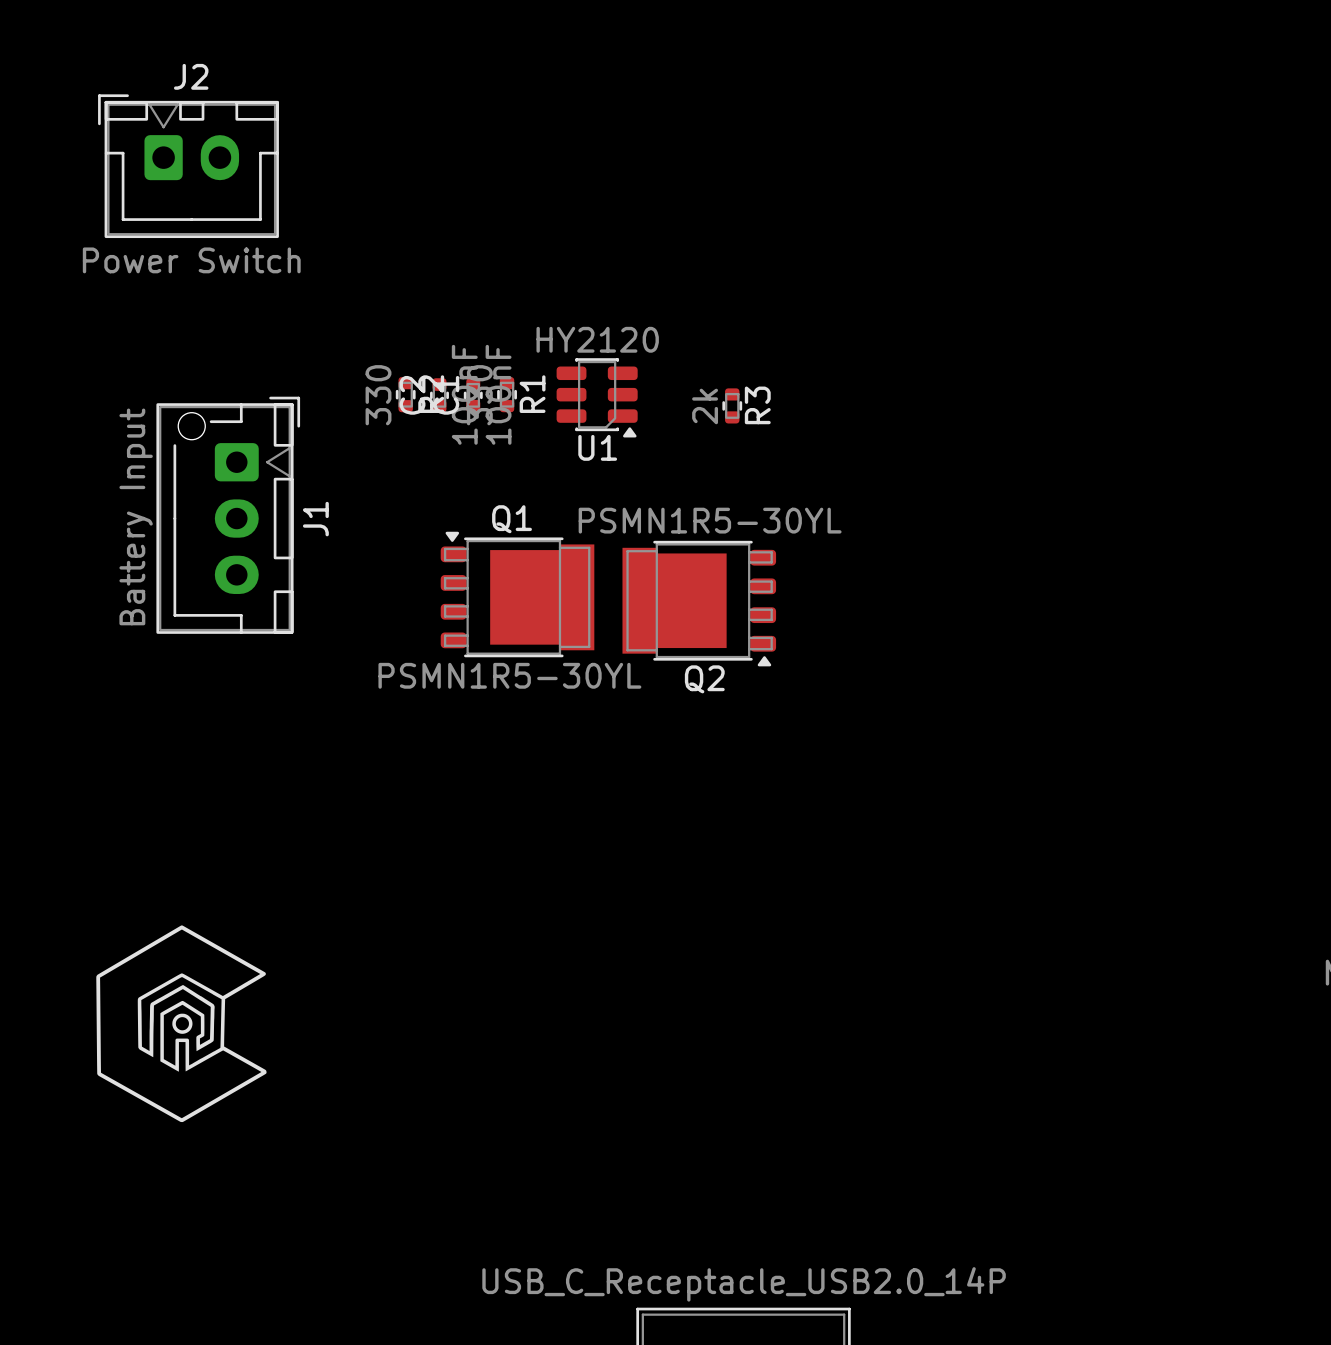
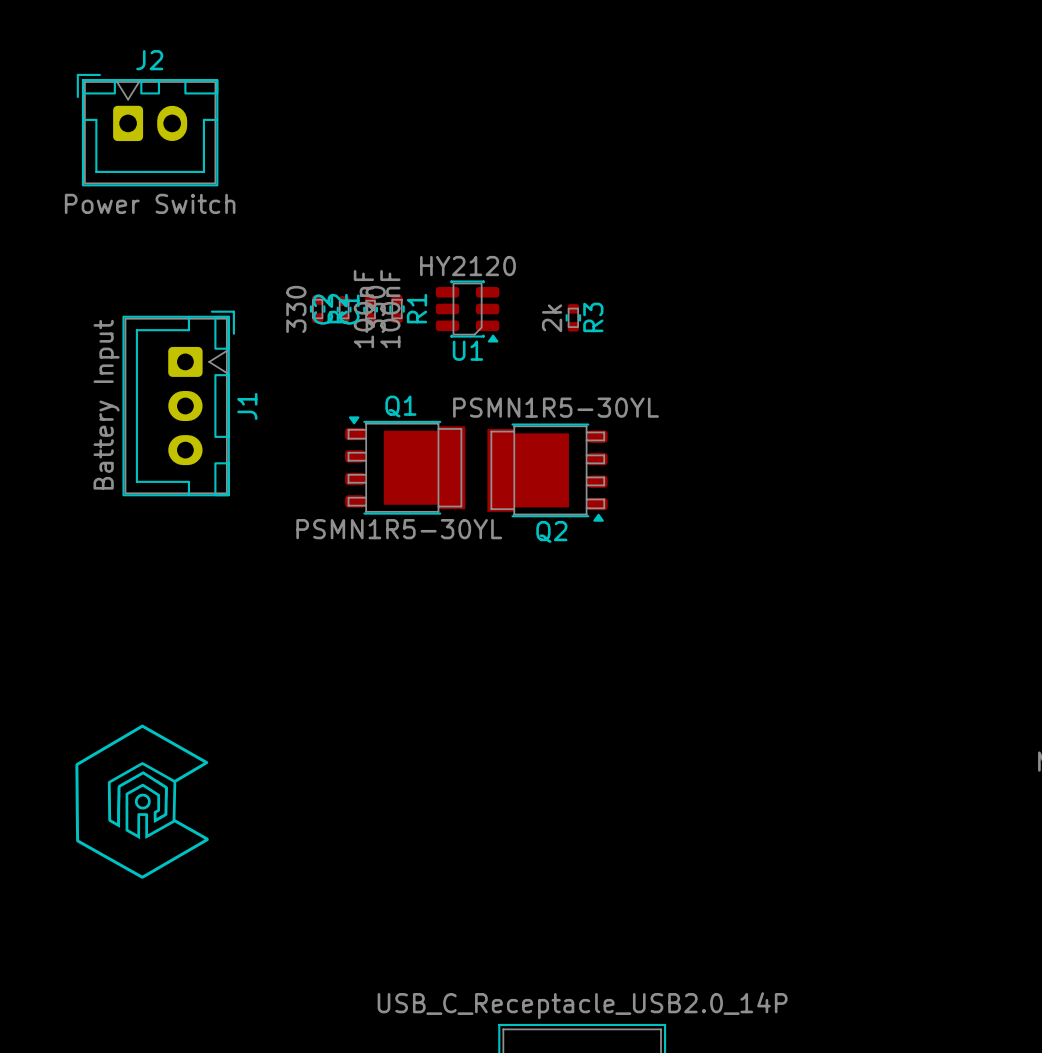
J1 footprint: [156, 396, 301, 634] -> [122, 310, 235, 497]

